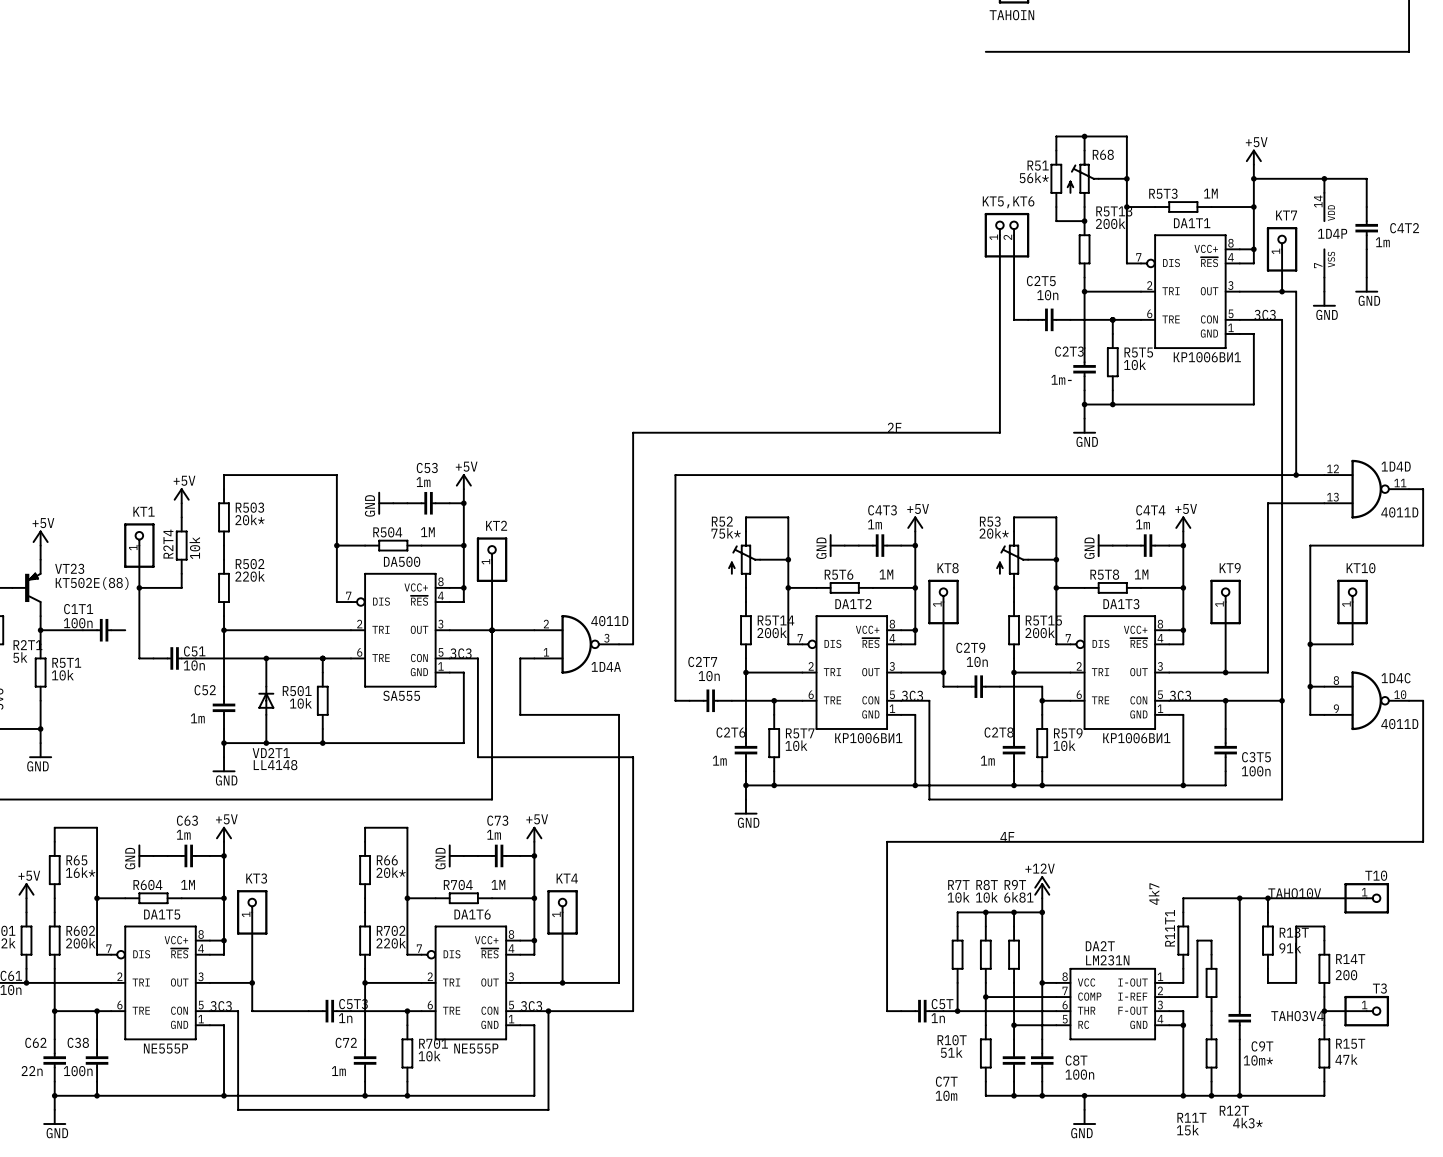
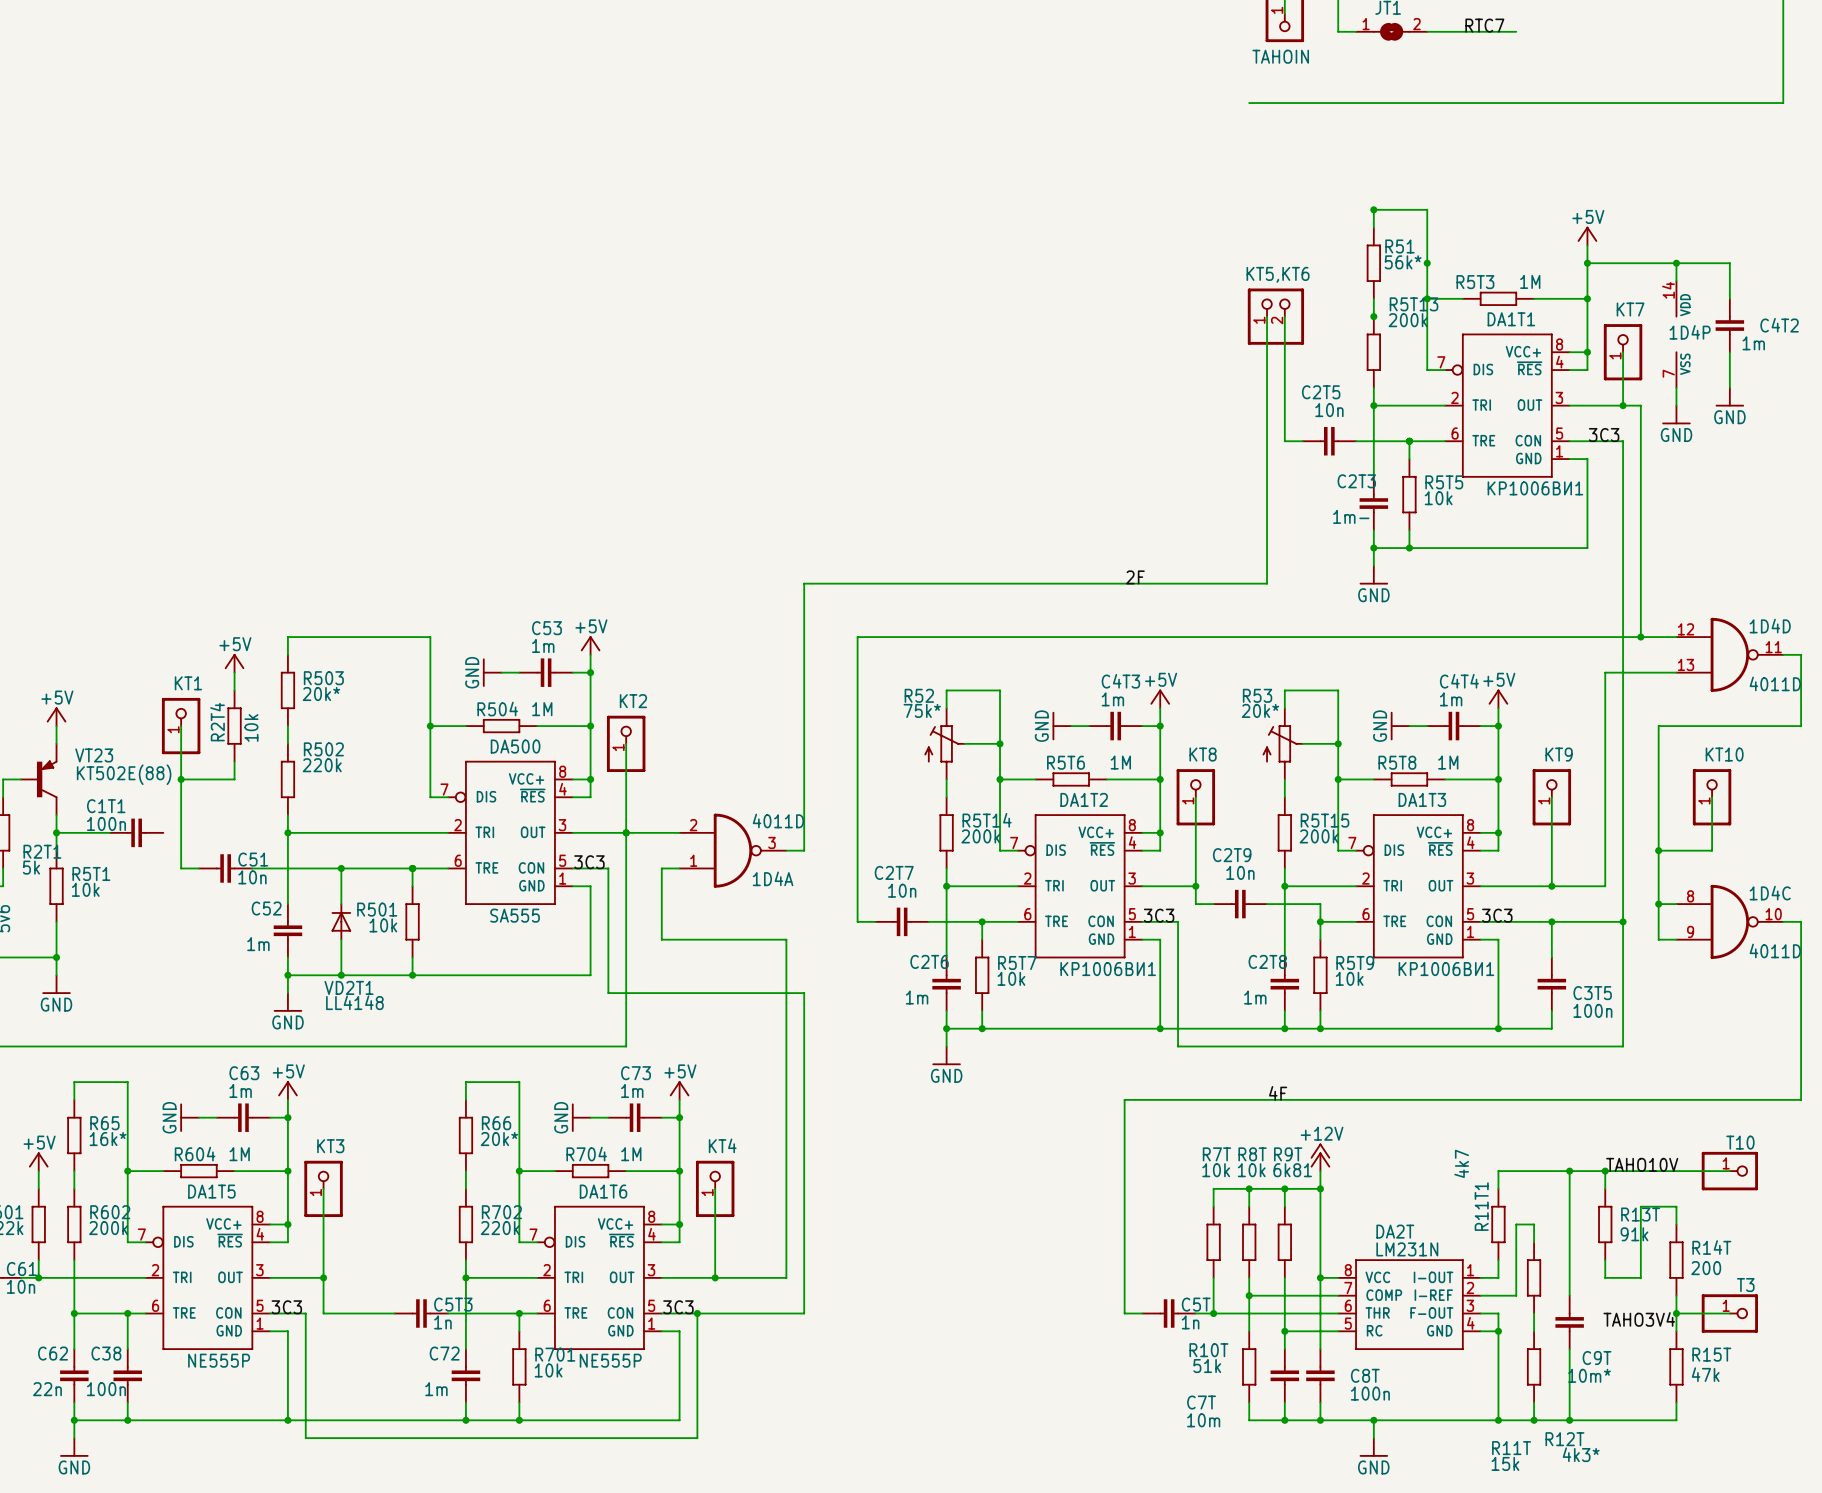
wire: (1084, 136) (1056, 136) (1056, 150) -> none
R51 name position: R51 (1038, 165) -> R51 (1399, 246)
R51 value position: 56k* (1034, 177) -> 56k* (1403, 262)
R51 position: (1056, 178) -> (1373, 263)
R68: (1083, 178) -> none
wire: (1098, 178) (1126, 178) -> none
wire: (1056, 207) (1056, 221) (1084, 221) -> none
KT5,KT6 position: (1006, 235) -> (1275, 316)

